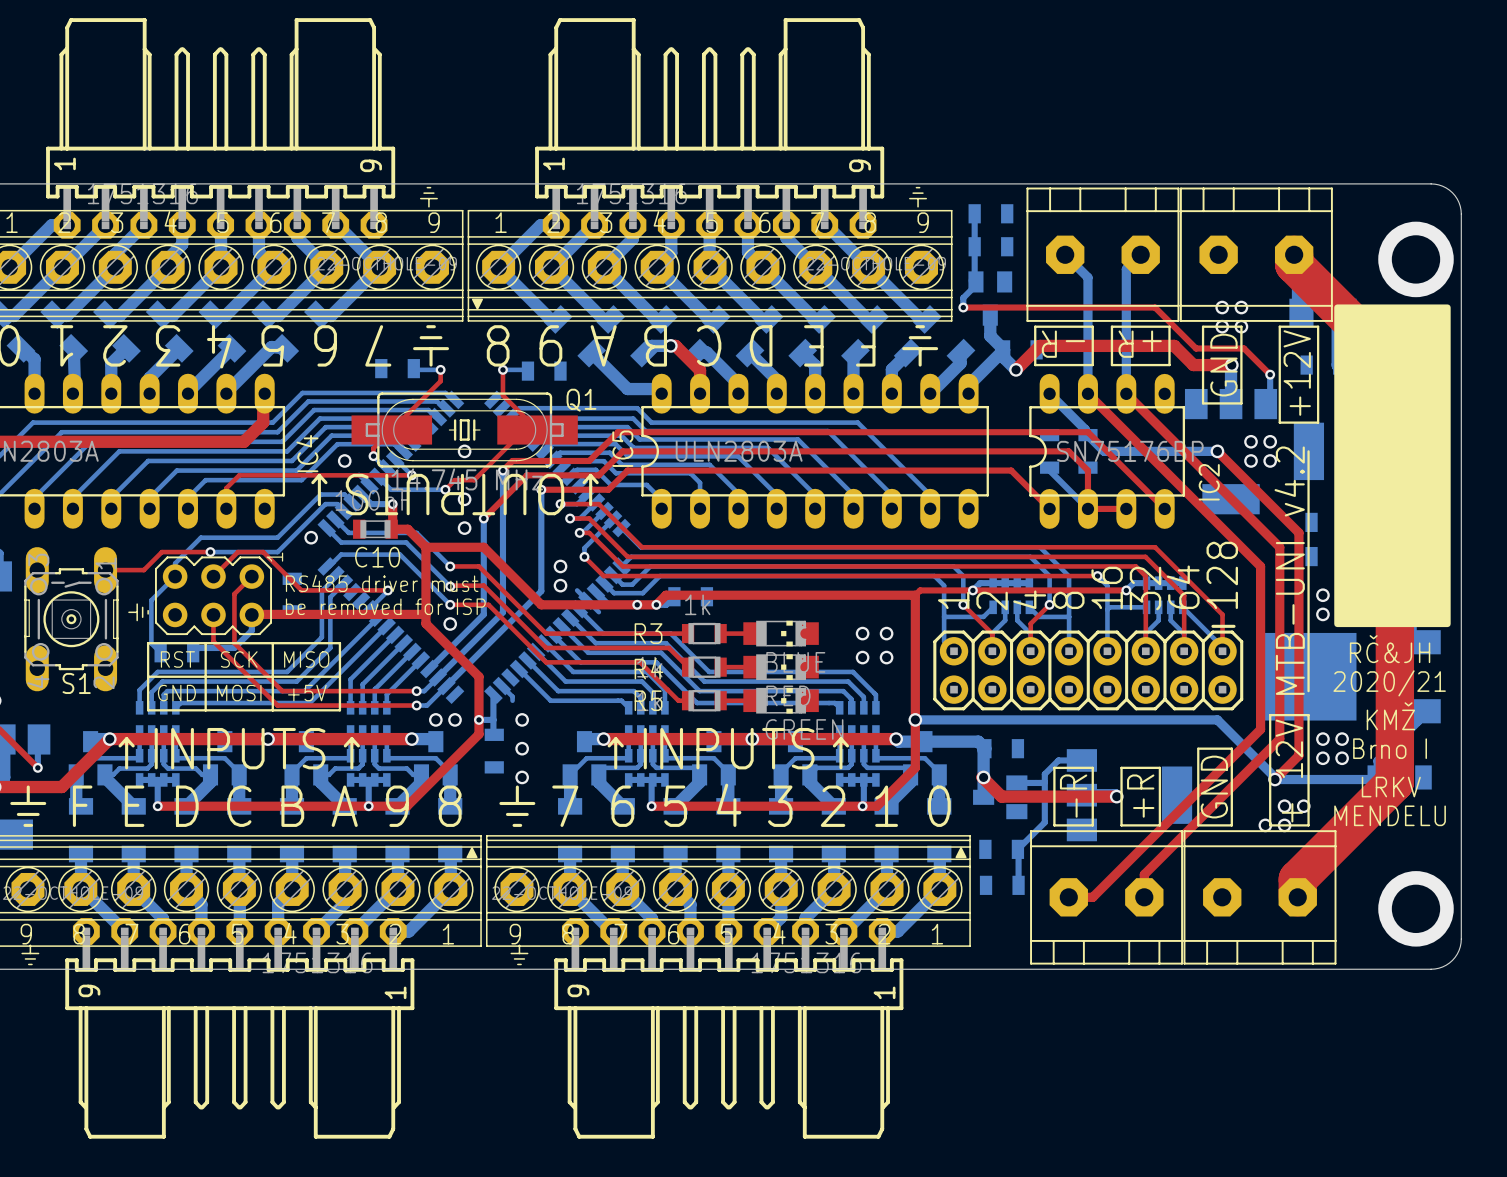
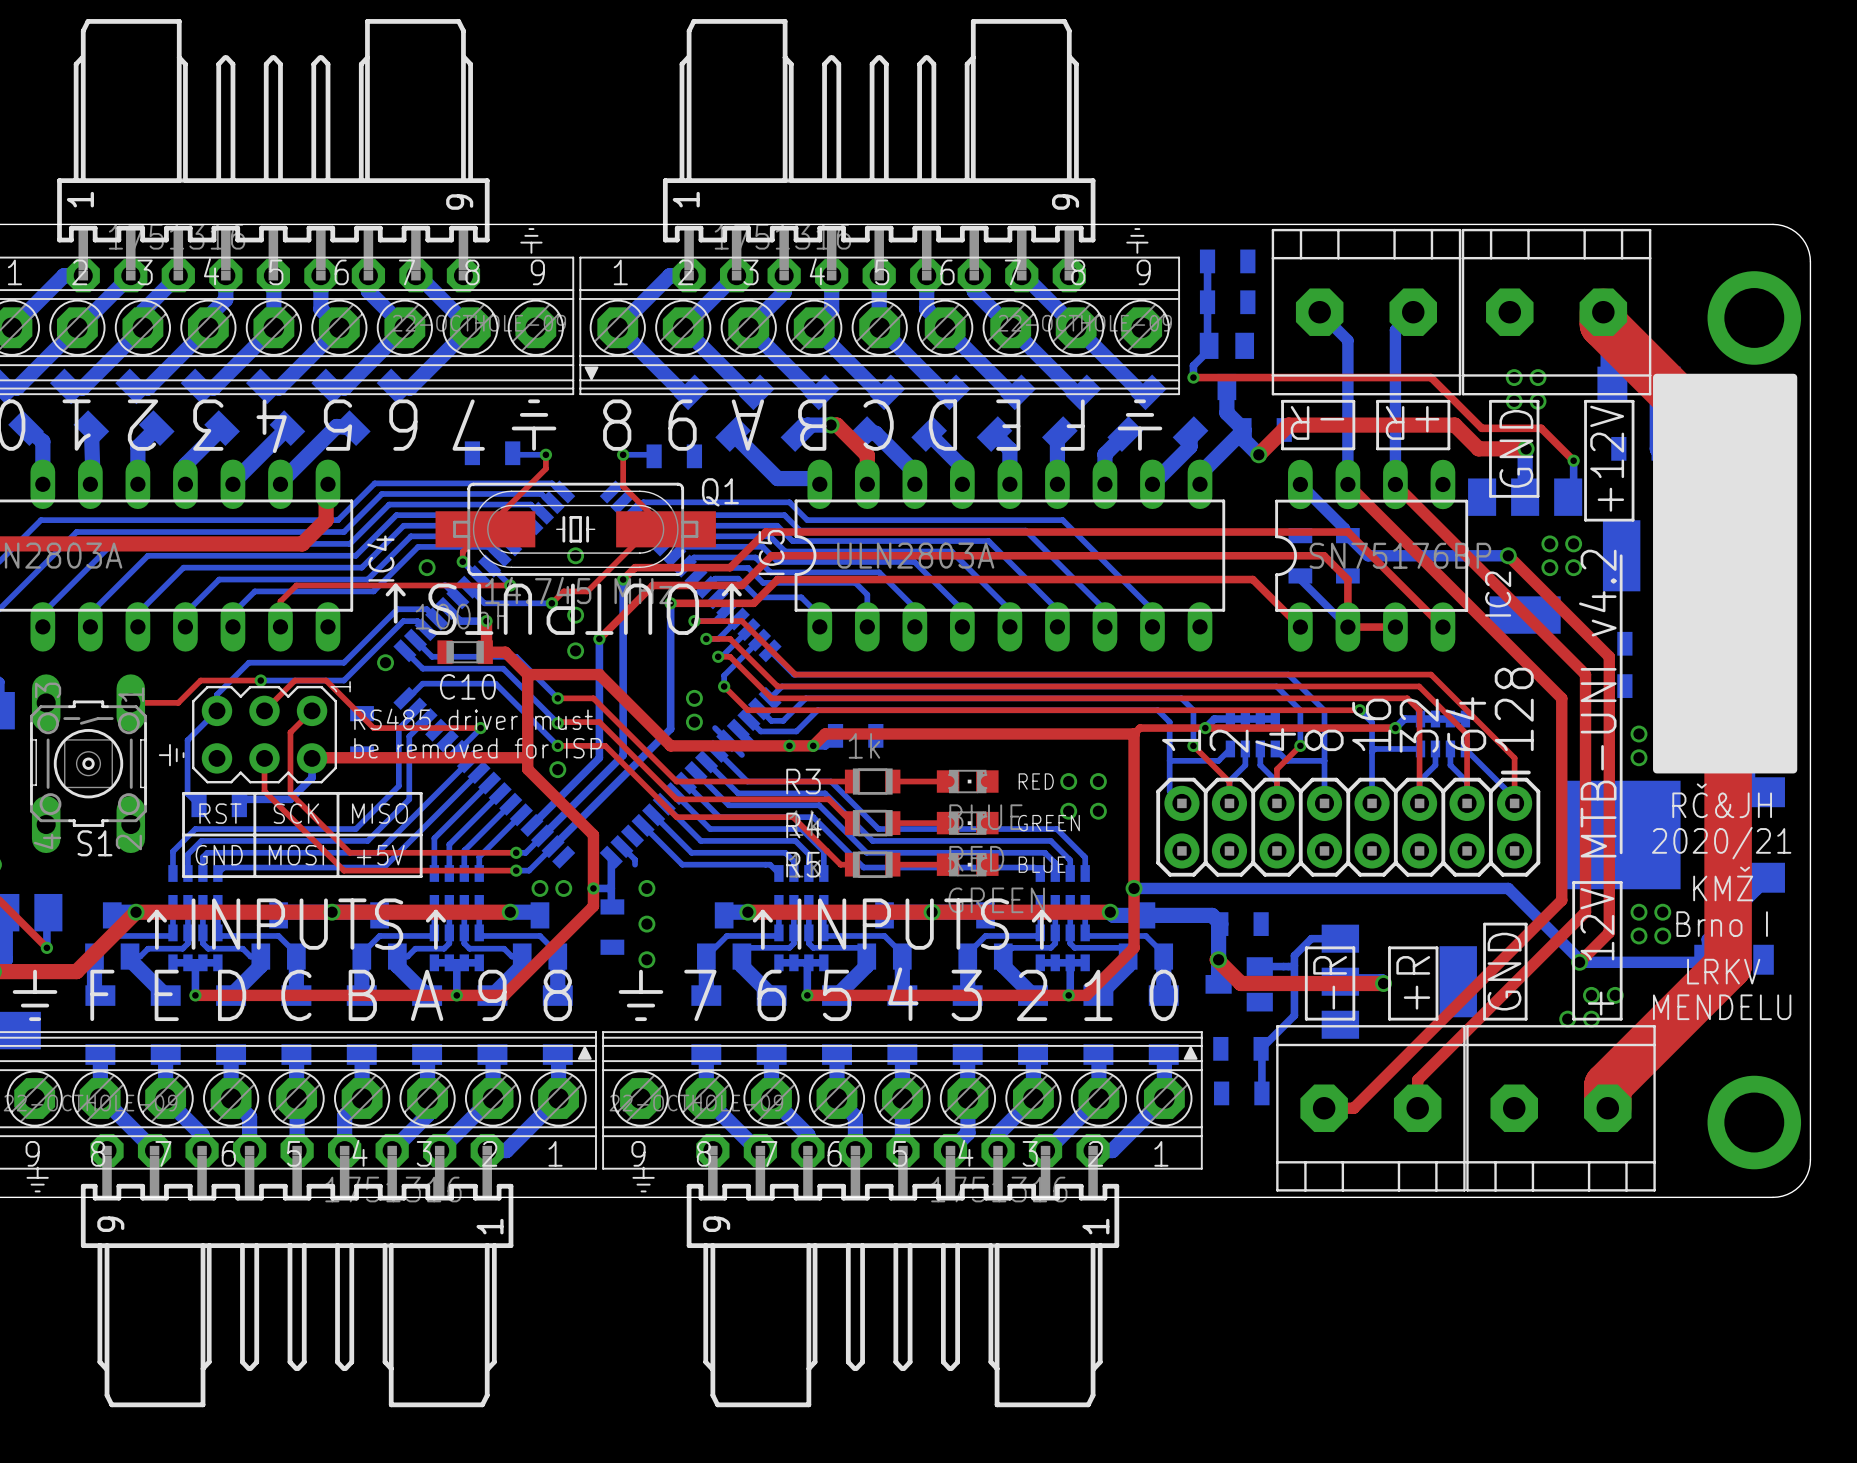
part footprint: [743, 620, 819, 647] -> [936, 769, 999, 794]
text: none -> RED (1036, 781)
part footprint: [743, 654, 819, 681] -> [936, 811, 999, 835]
text: none -> GREEN (1048, 823)
part footprint: [743, 687, 819, 714] -> [936, 852, 999, 877]
text: none -> BLUE (1042, 864)

